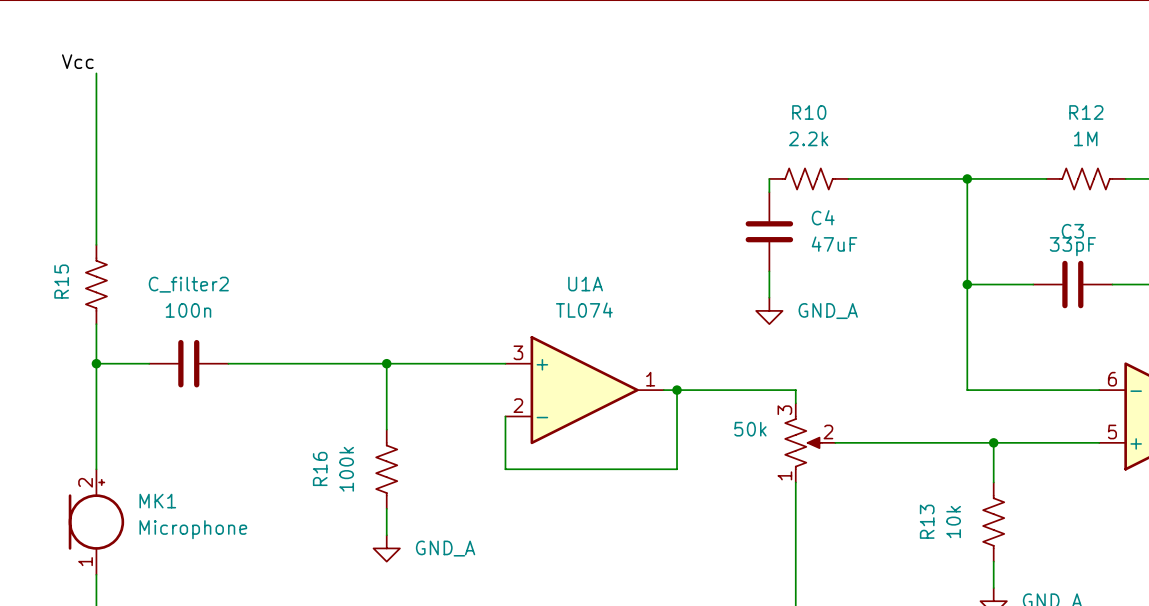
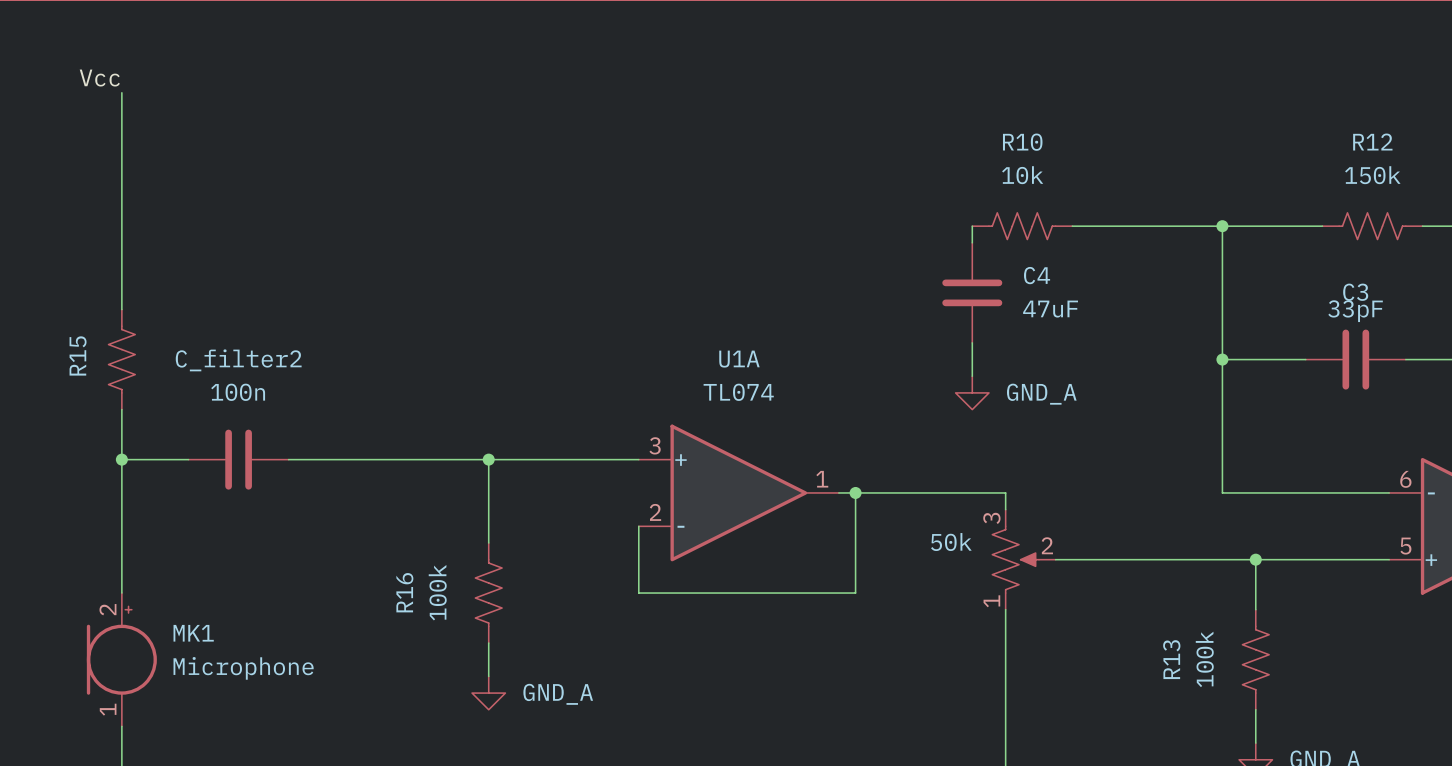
R10 value: 2.2k (808, 138) -> 10k (1022, 175)
R12 value: 1M (1085, 138) -> 150k (1372, 175)
R13 value: 10k (953, 522) -> 100k (1204, 659)

